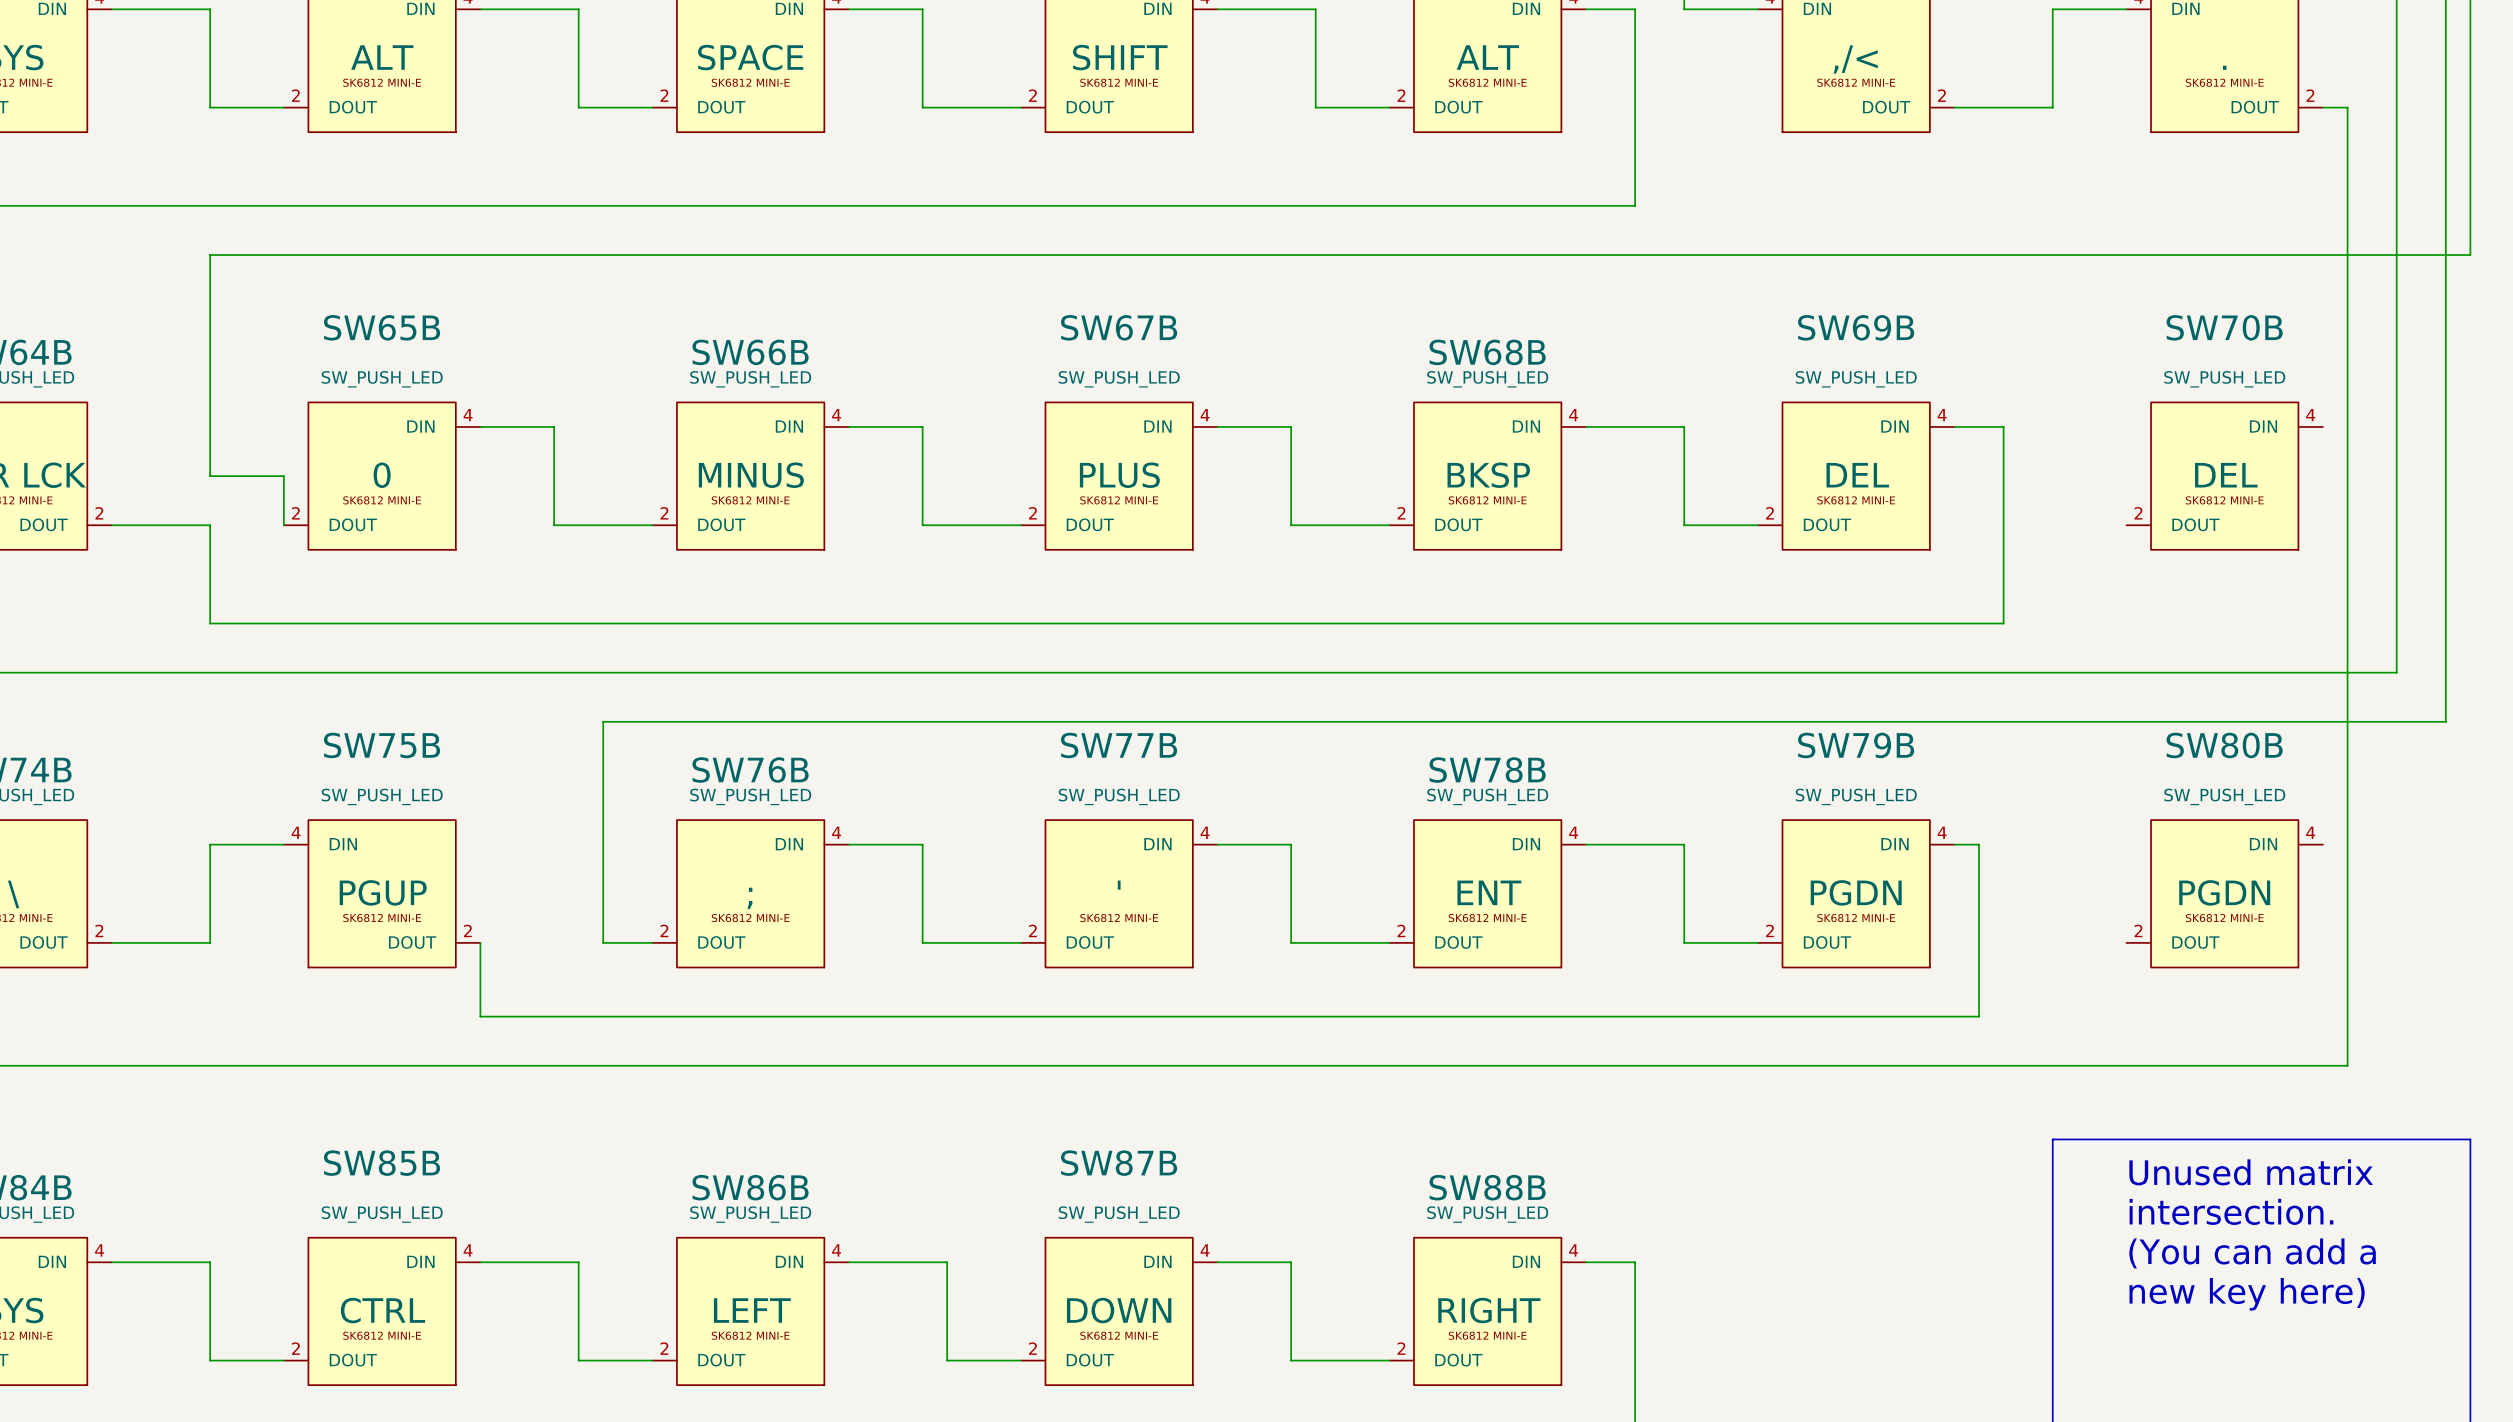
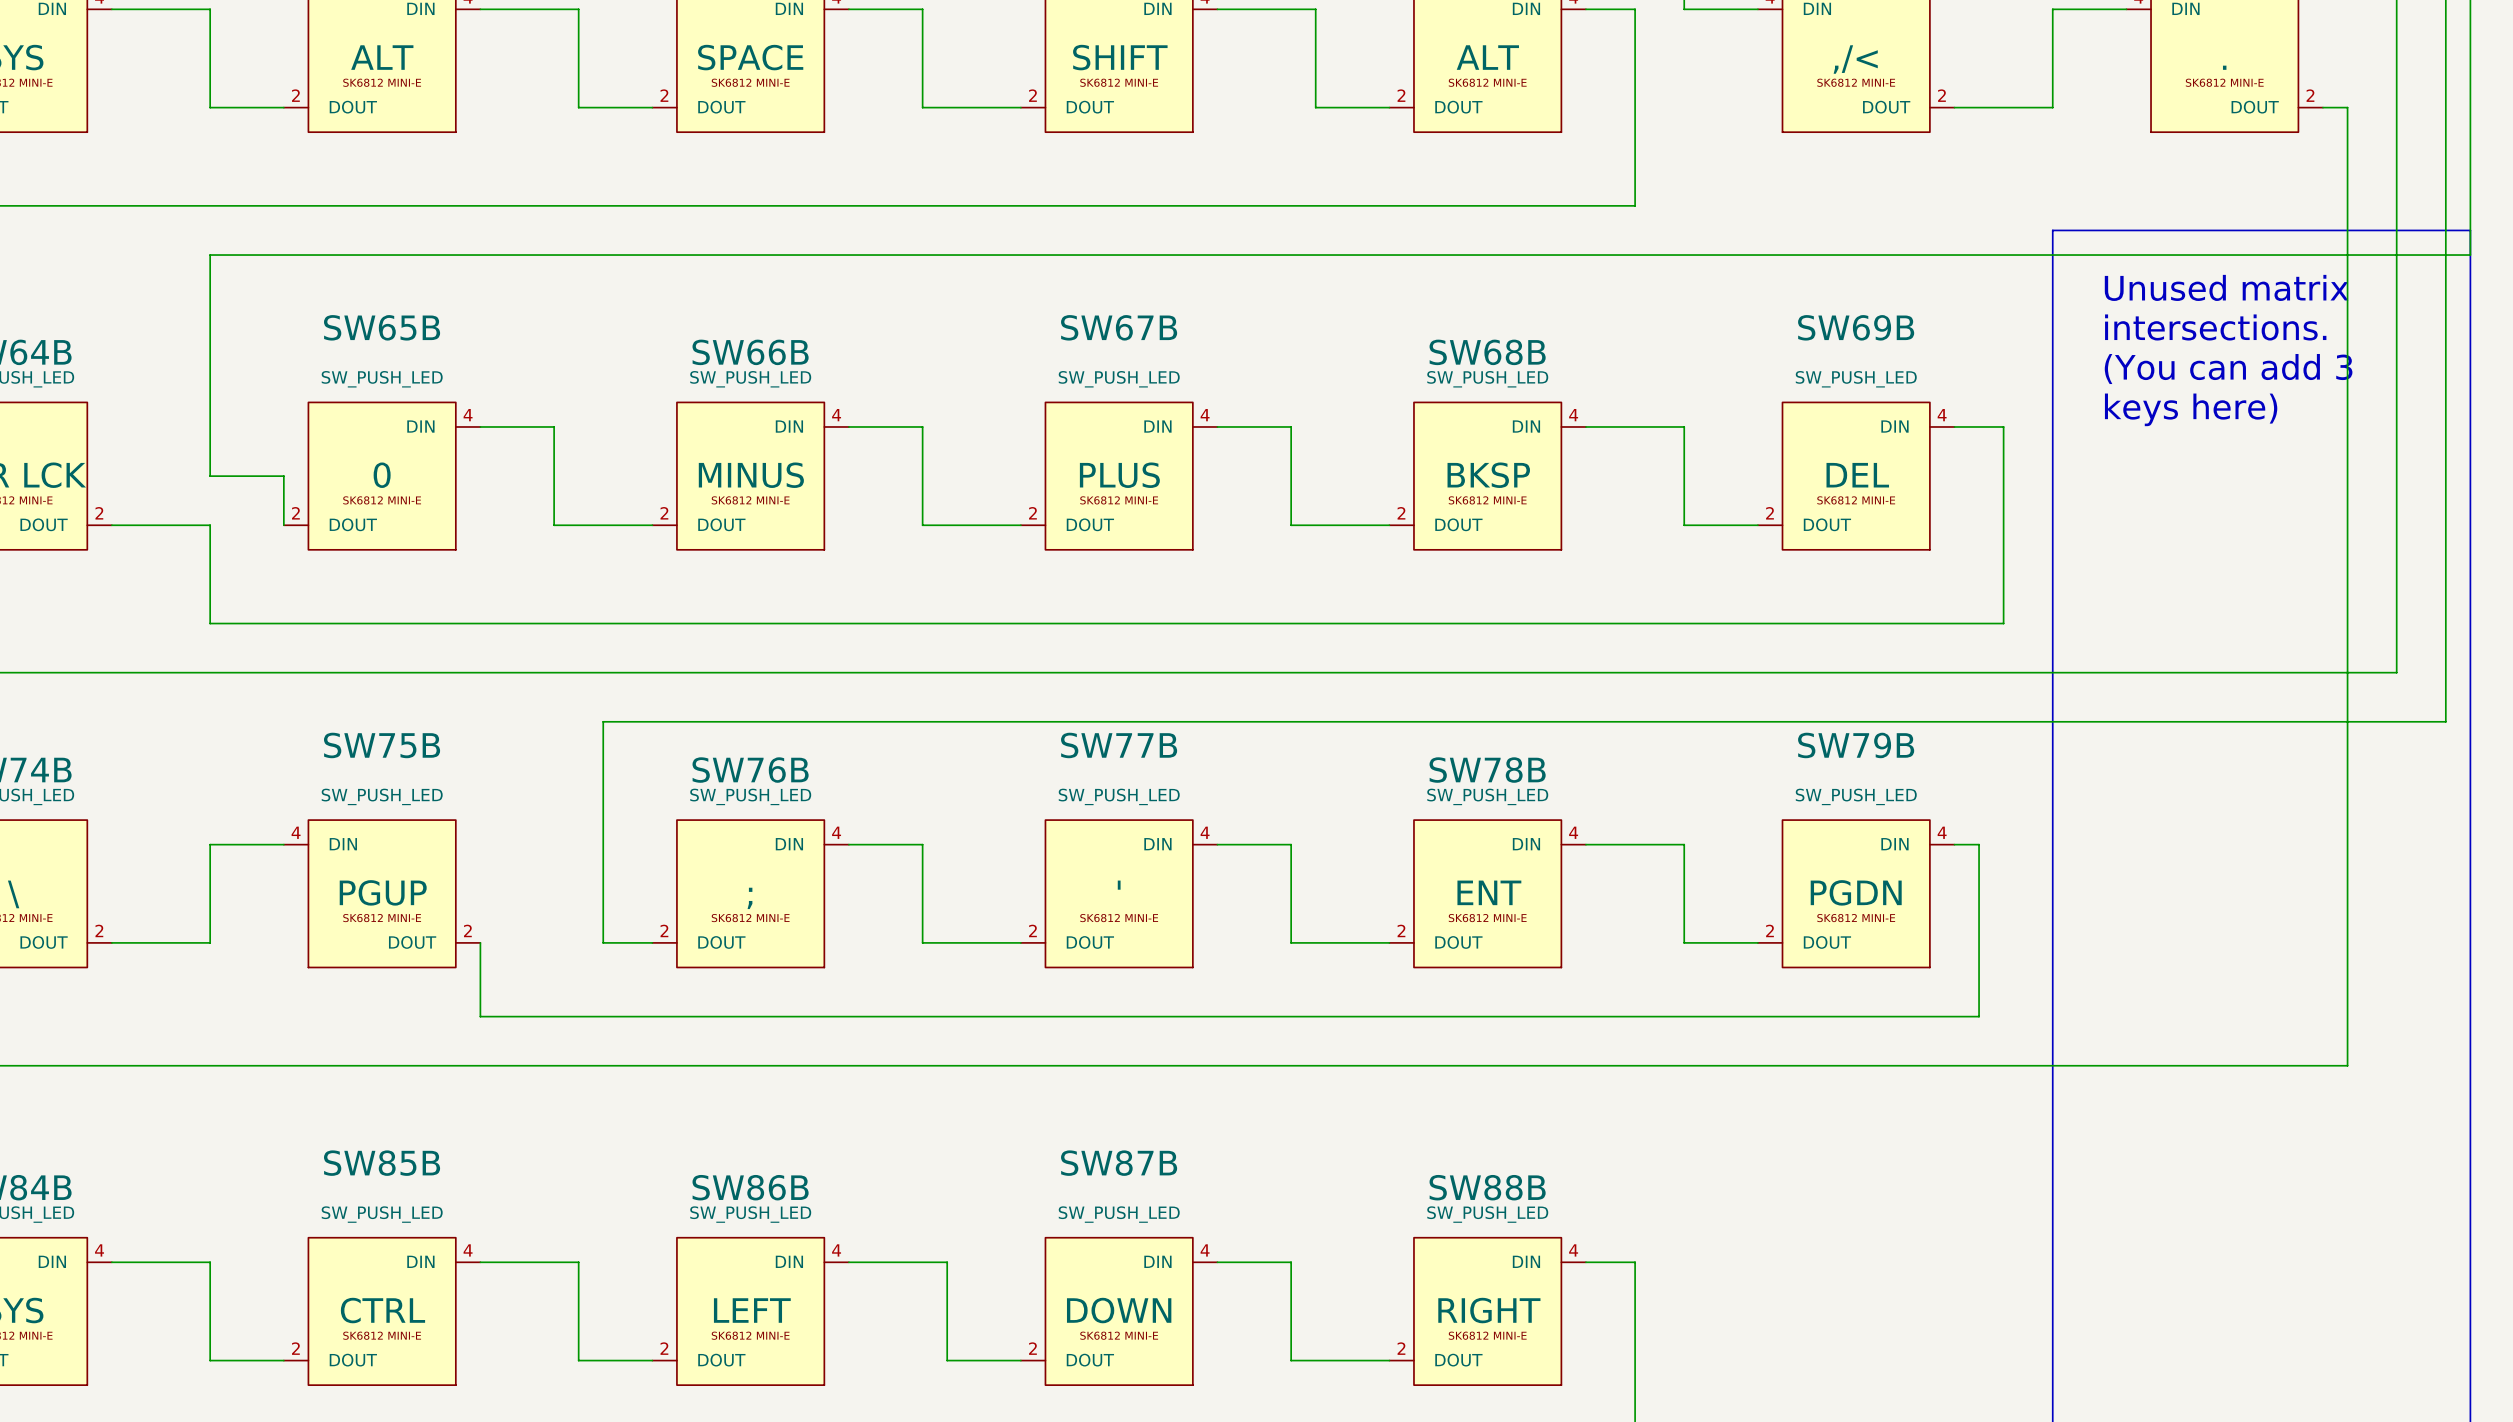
text: none -> Unused matrix (2226, 287)
text: none -> intersections. (2215, 327)
text: none -> (You can add 3 (2228, 369)
text: none -> keys here) (2191, 409)
SW70B: SW_PUSH_LED (2224, 476) -> none
SW80B: SW_PUSH_LED (2224, 893) -> none
line: (2052, 1139) (2470, 1139) -> (2052, 1139) (2052, 230) (2470, 230) (2470, 1139)
text: Unused matrix (2251, 1172) -> none
text: intersection. (2231, 1211) -> none
text: (You can add a (2252, 1253) -> none
text: new key here) (2247, 1294) -> none

